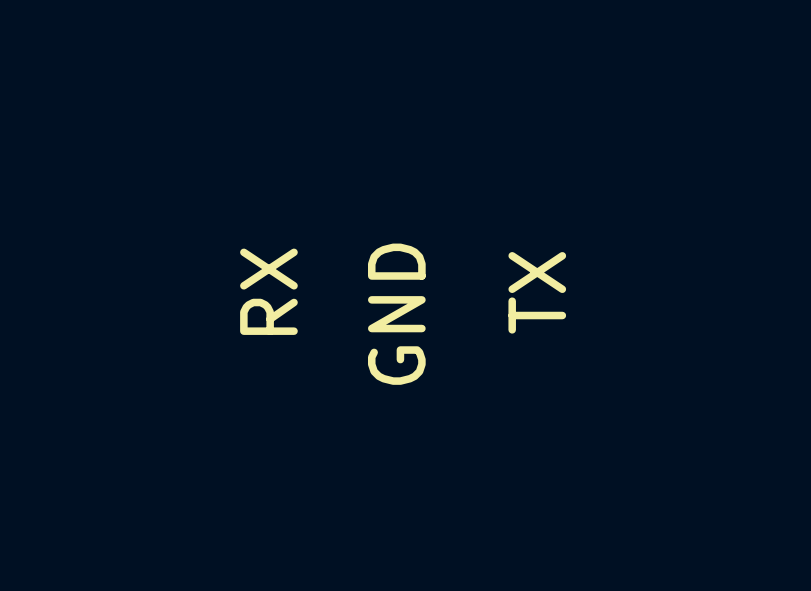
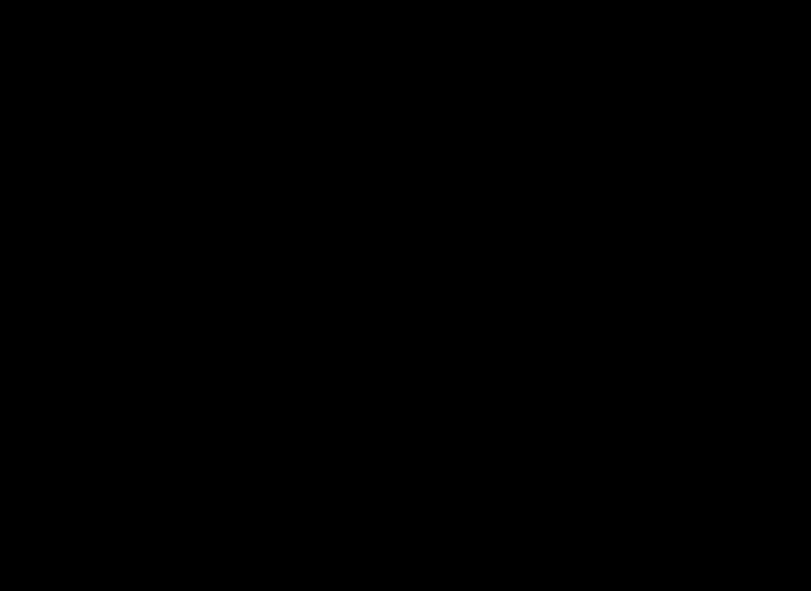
text: RX (268, 291) -> none
text: TX (537, 292) -> none
text: GND (396, 314) -> none

